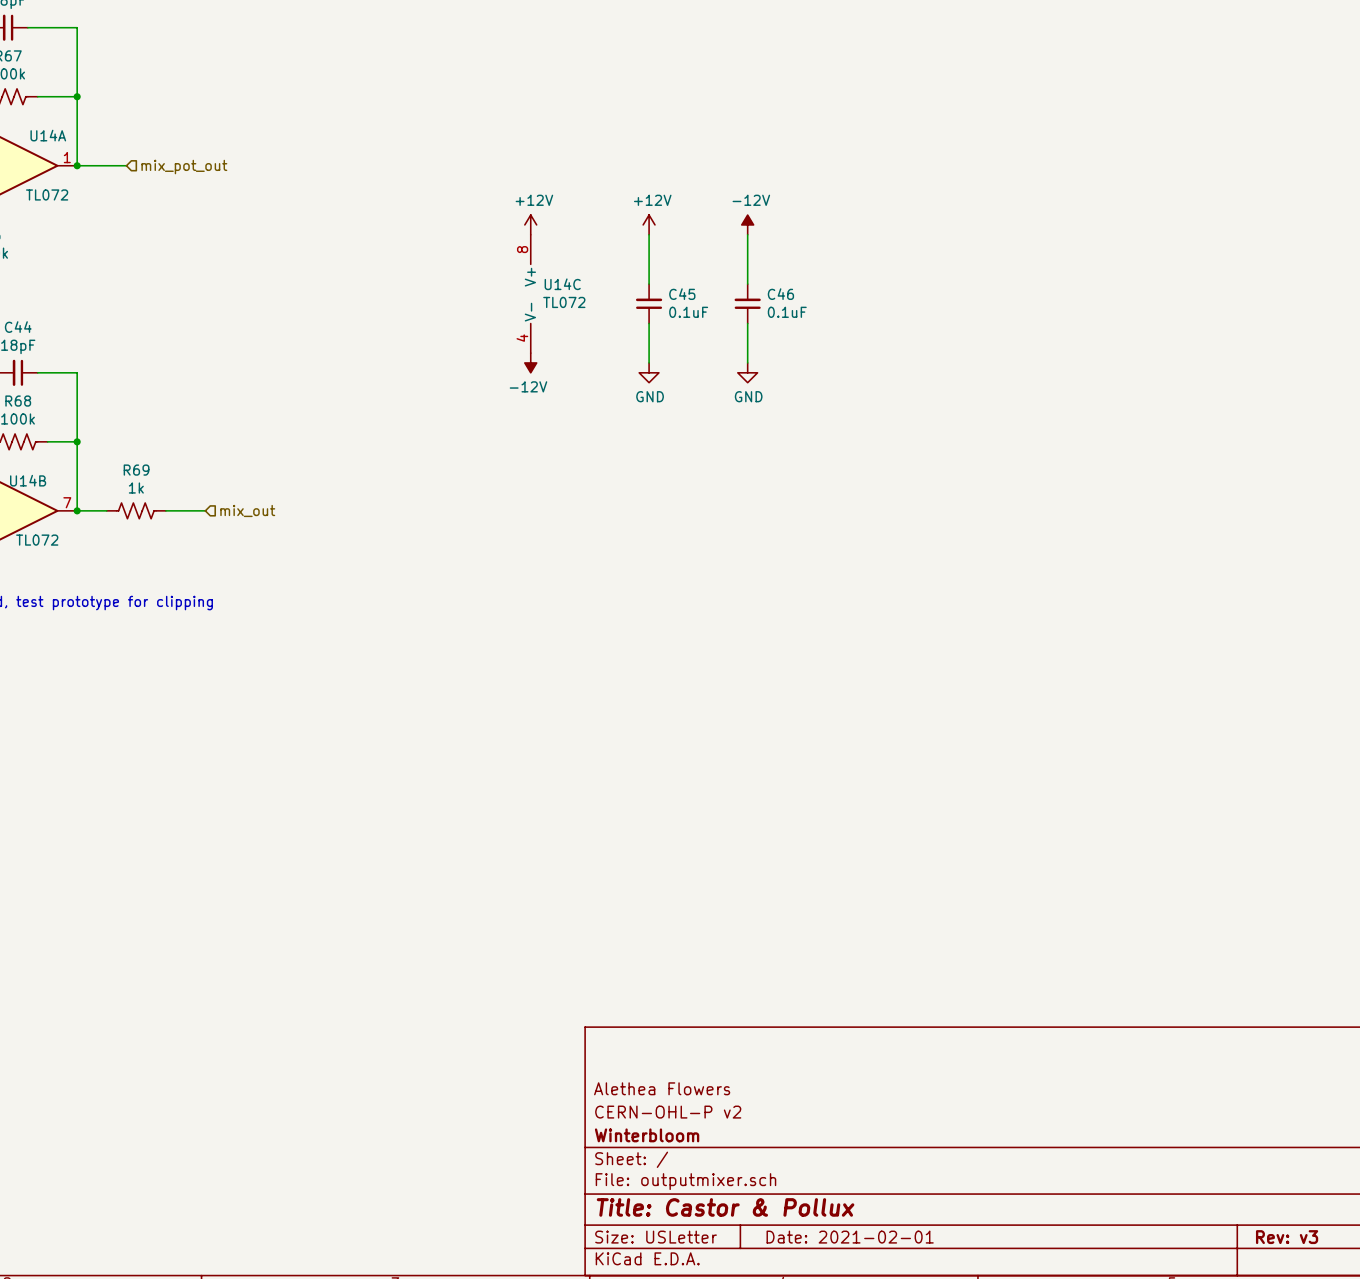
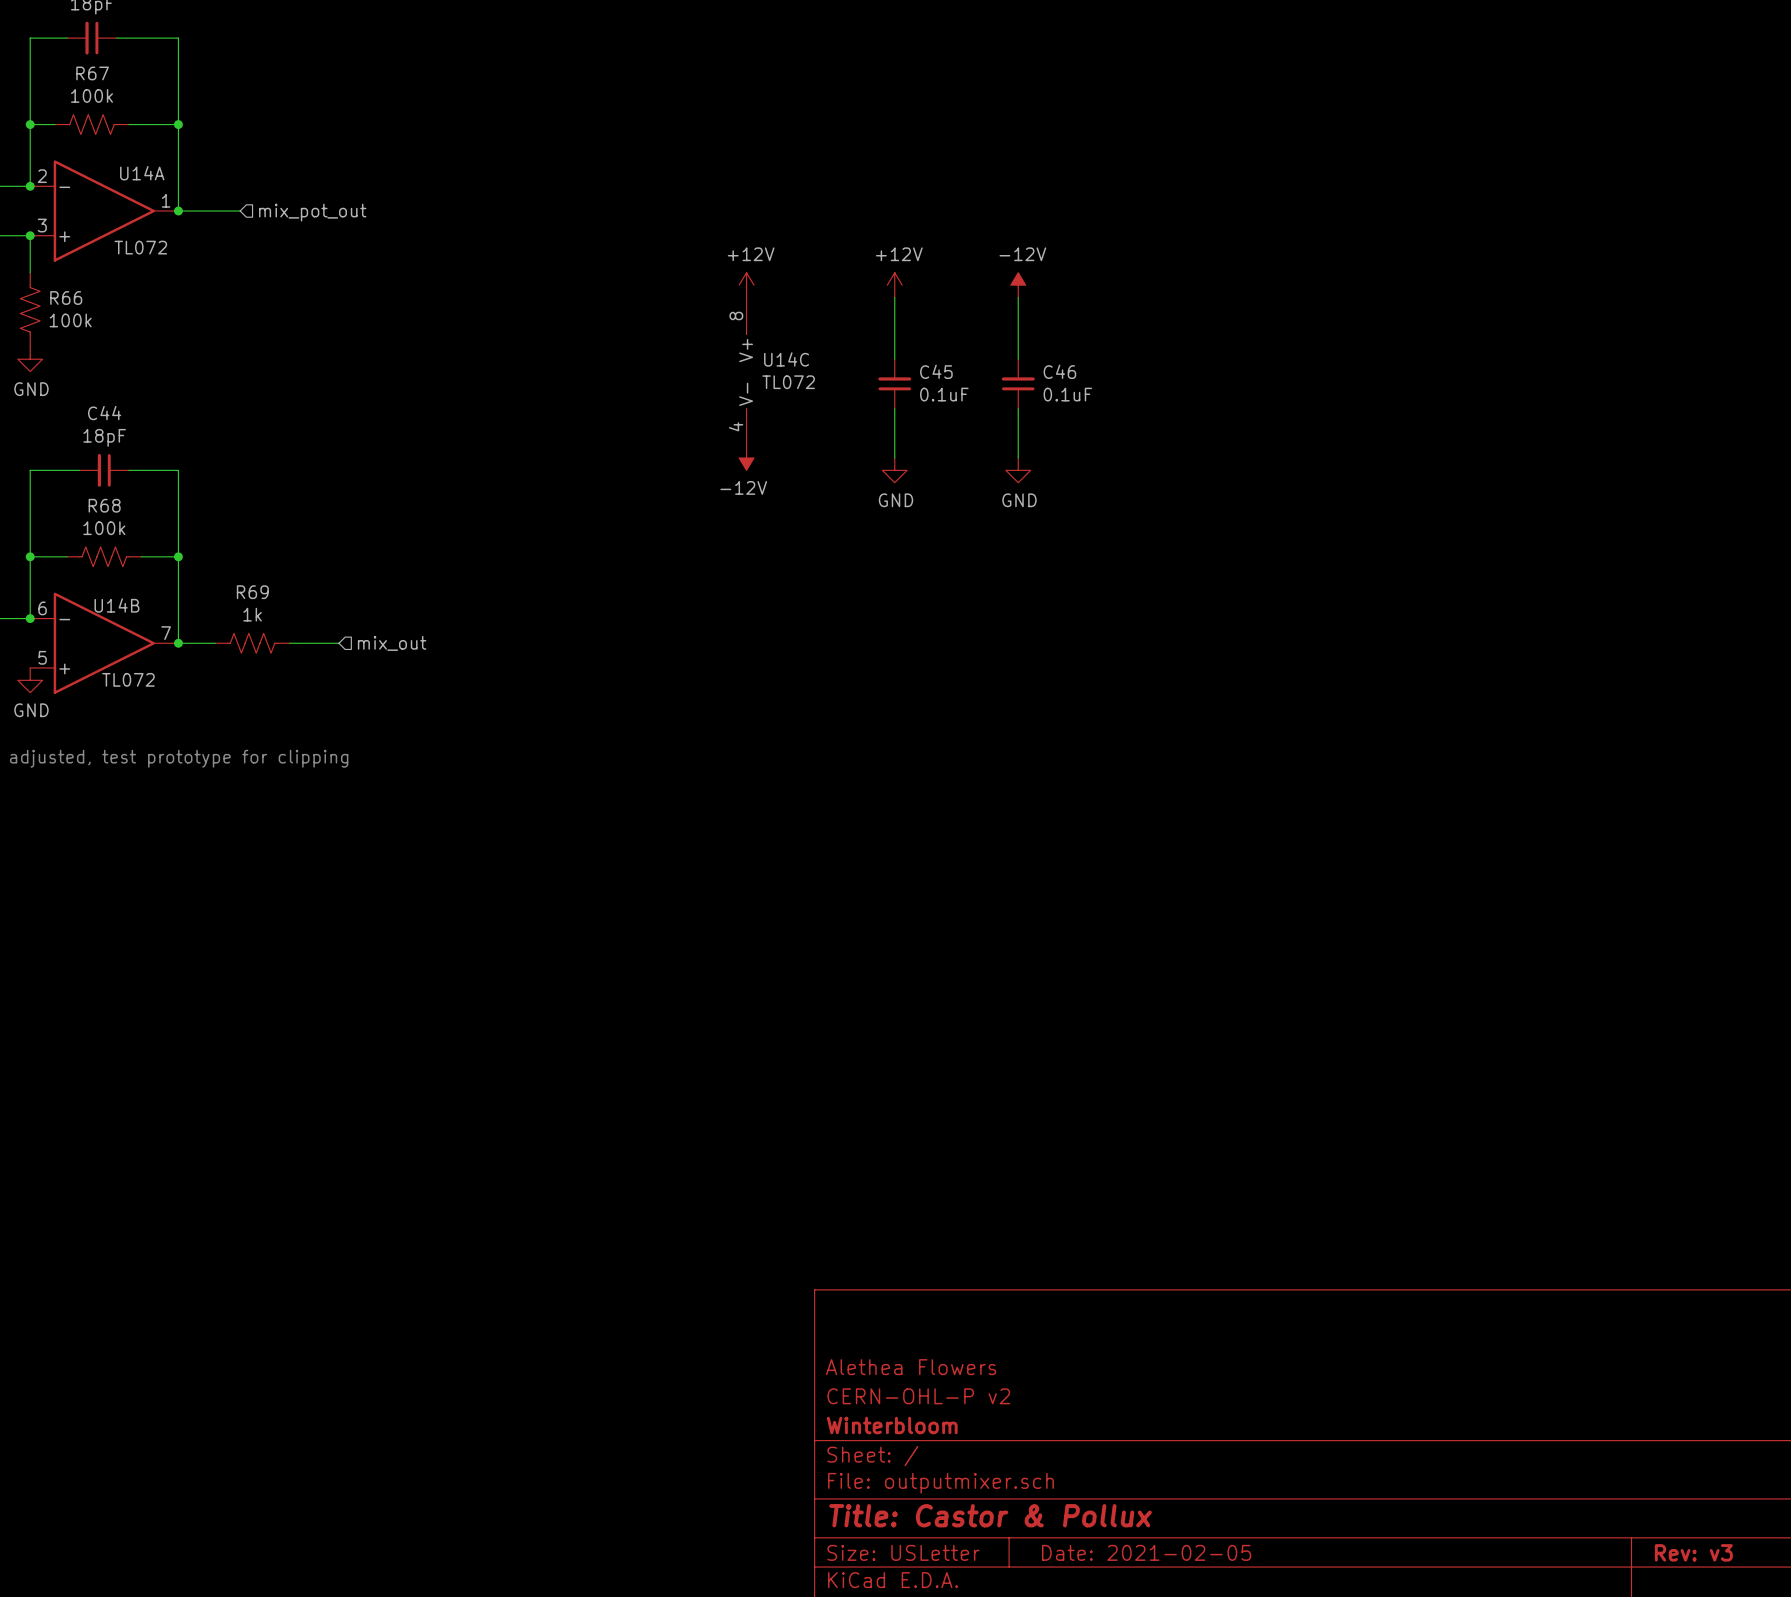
title block: Date: 2021-02-01 (850, 1237) -> Date: 2021-02-05 (1146, 1552)

